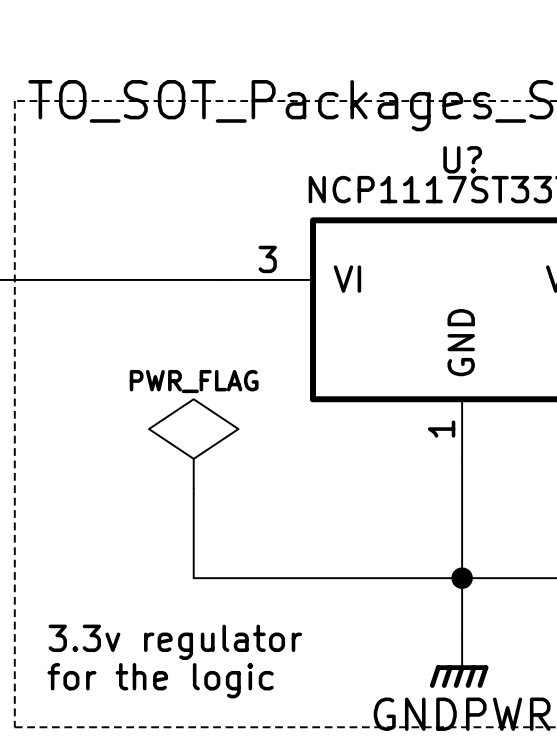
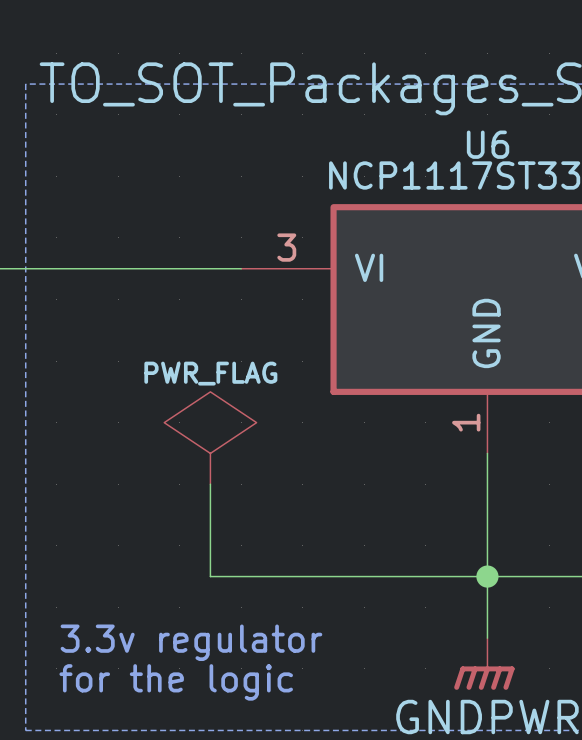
U? name: U? (462, 159) -> U6 (488, 144)

